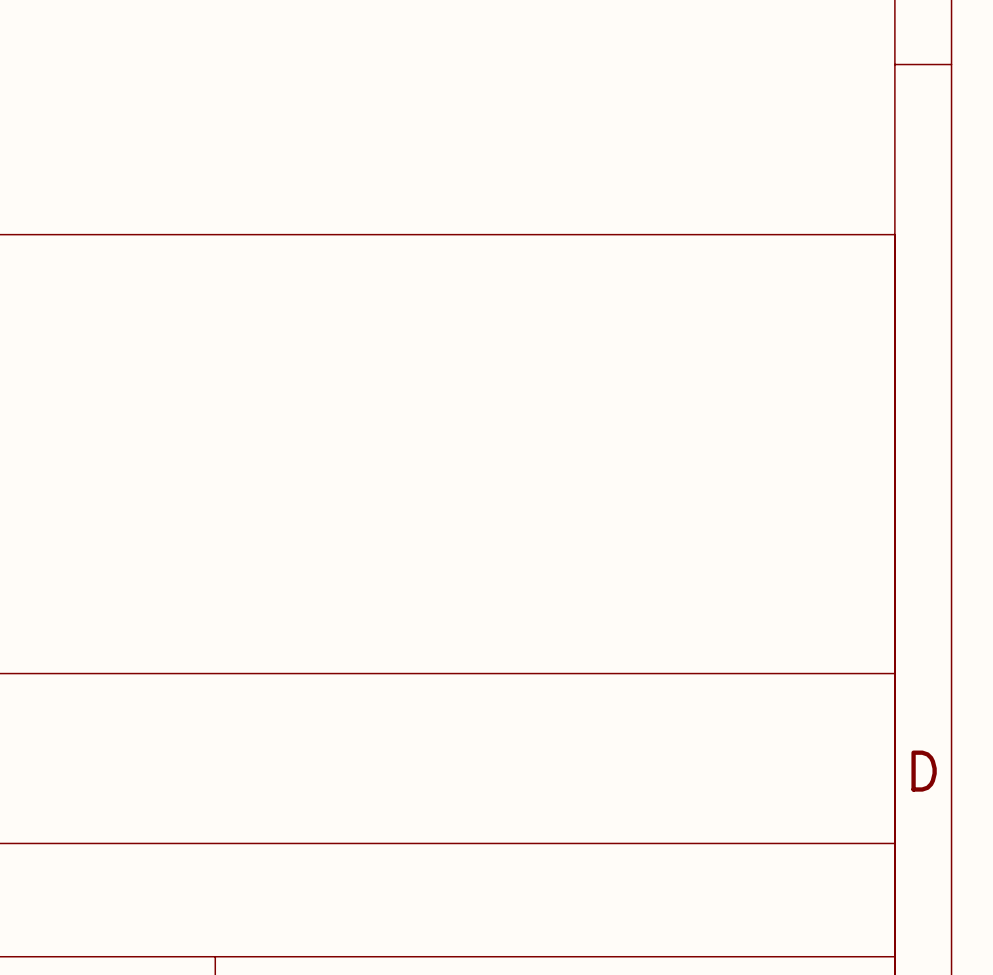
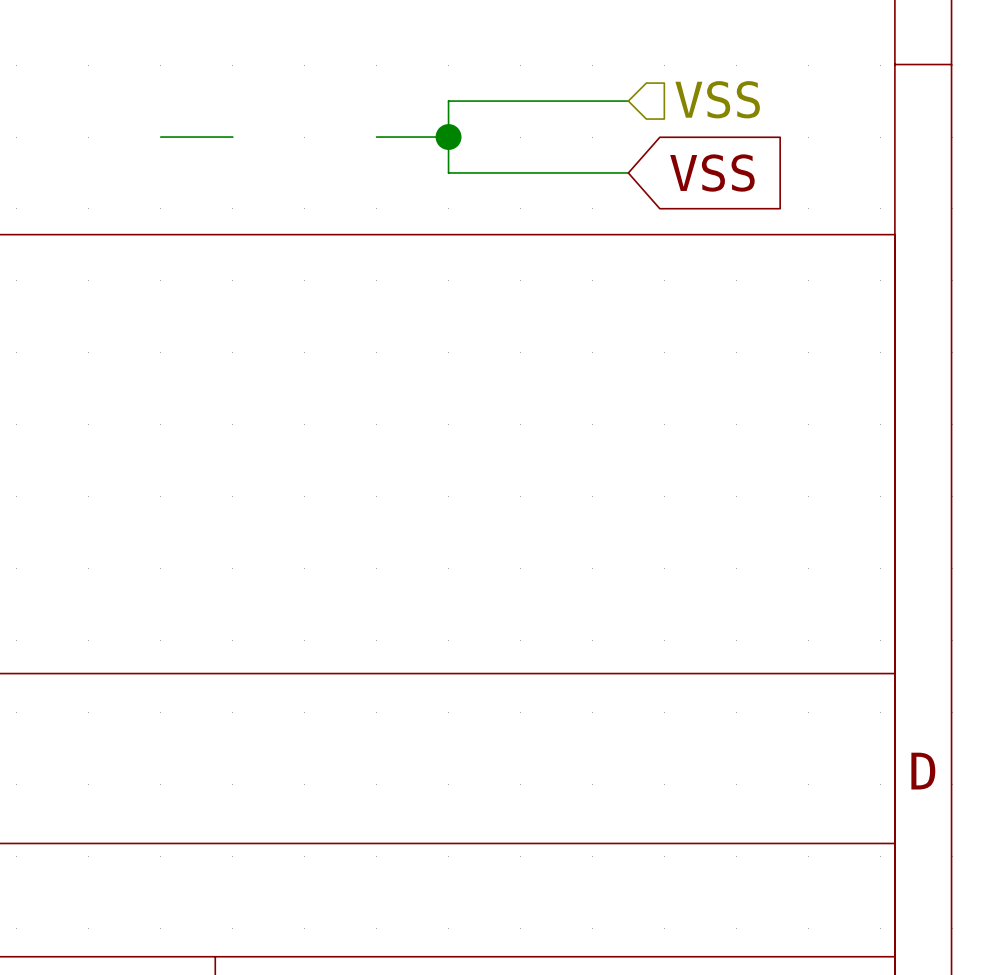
hierarchical label: none -> VSS (717, 99)
wire: none -> (628, 101) (448, 101) (448, 172) (628, 172)
wire: none -> (160, 137) (232, 137)
wire: none -> (376, 137) (448, 137)
junction: none -> (448, 137)
global label: none -> VSS (712, 173)

